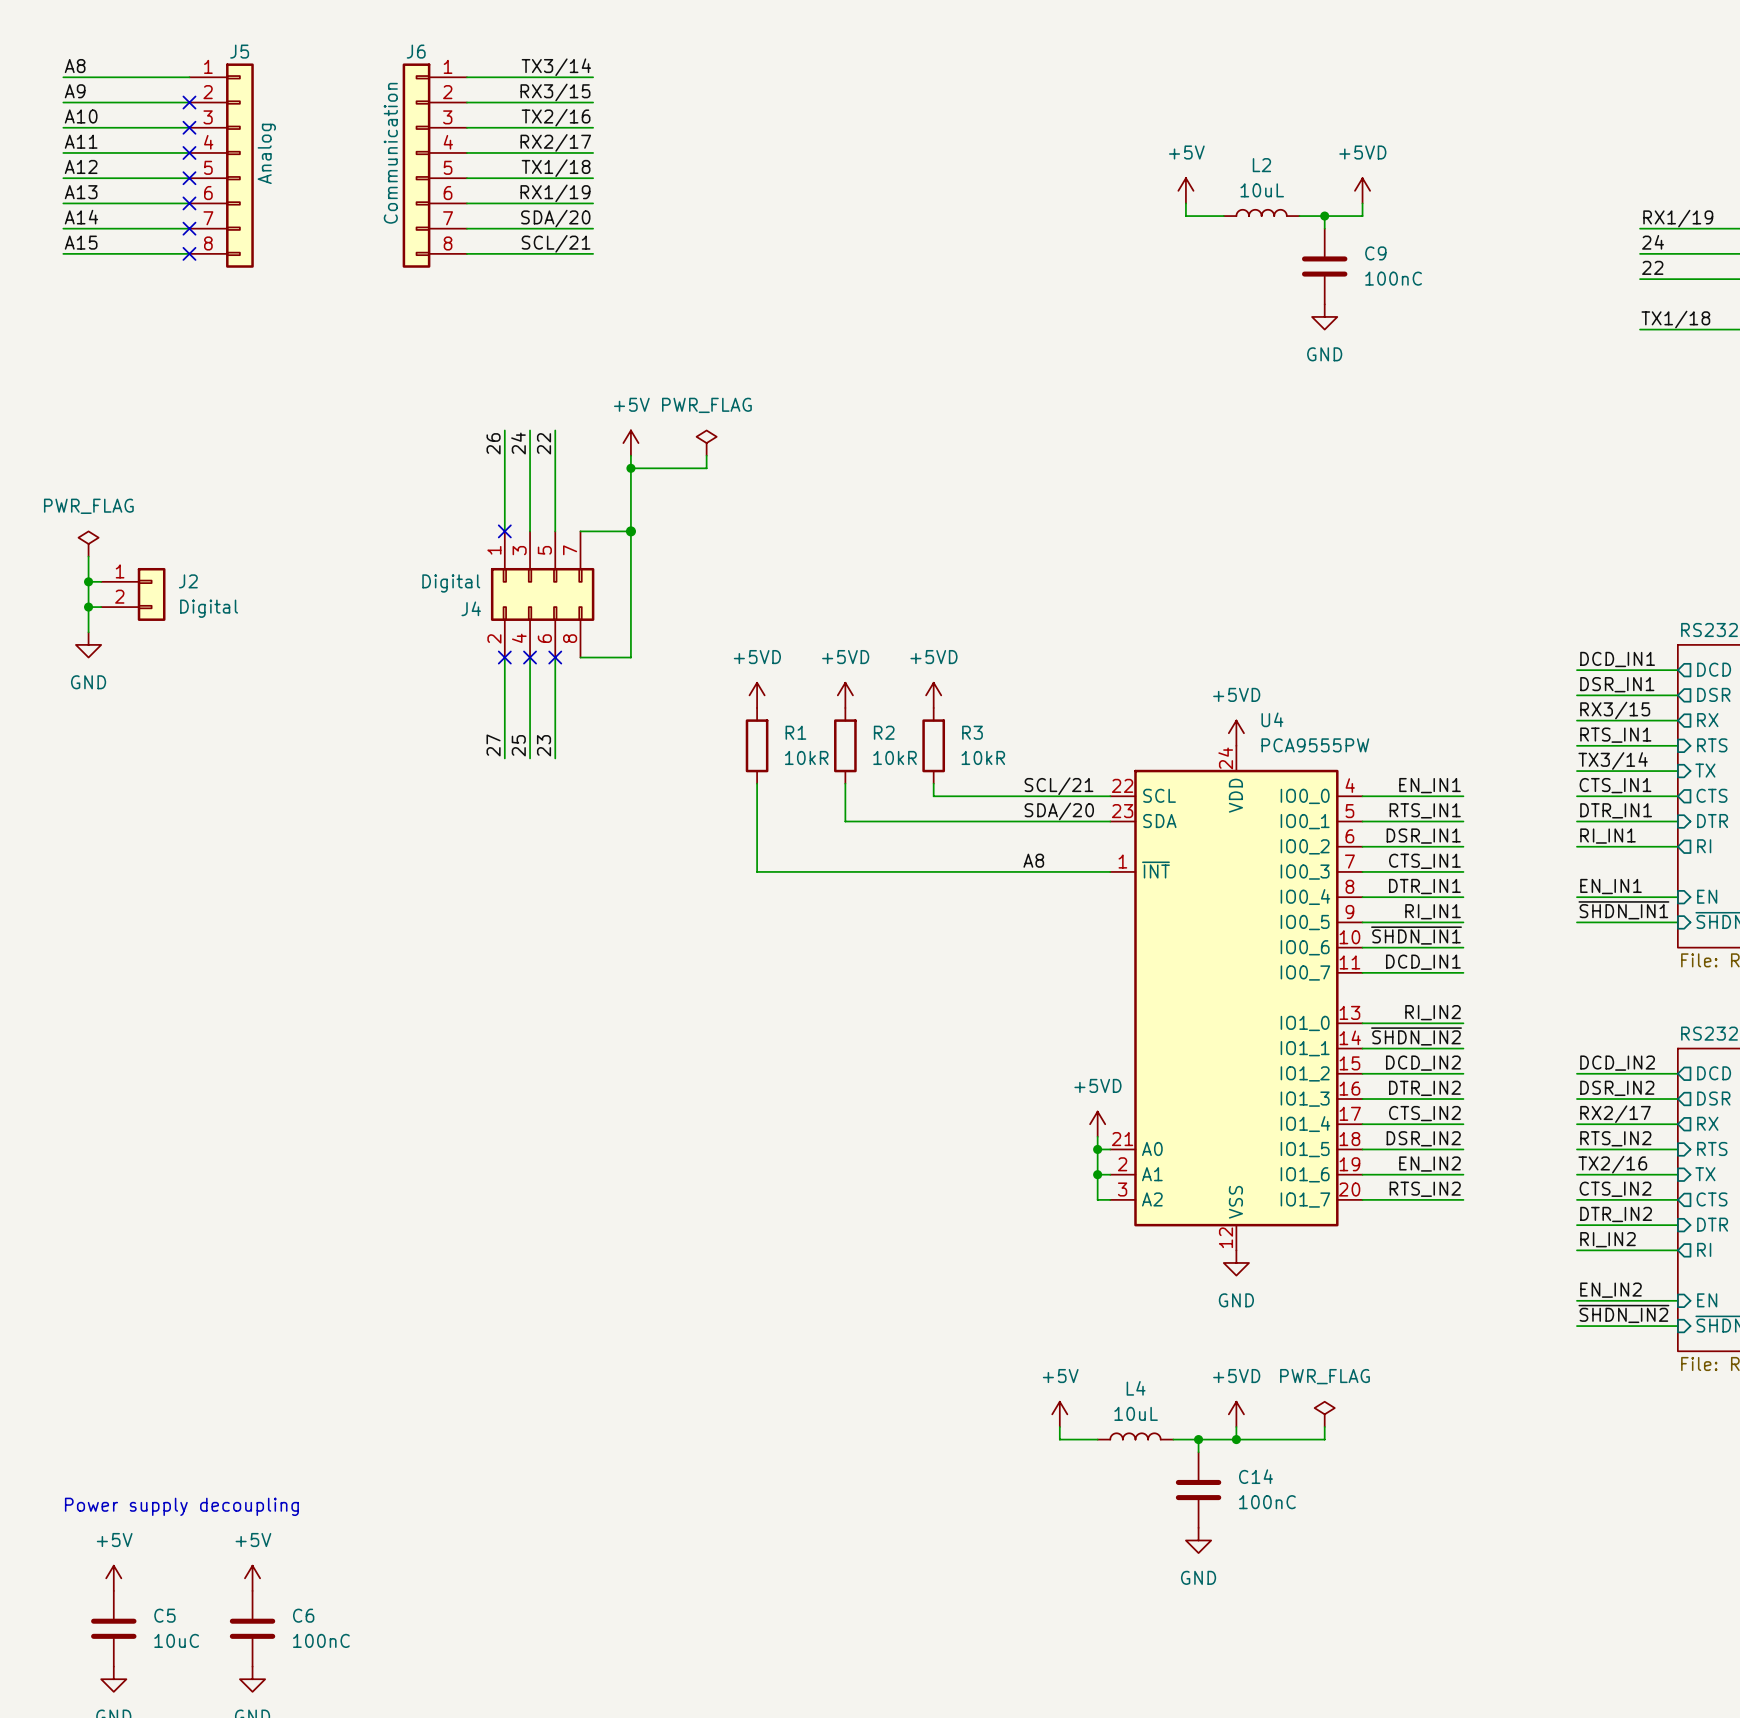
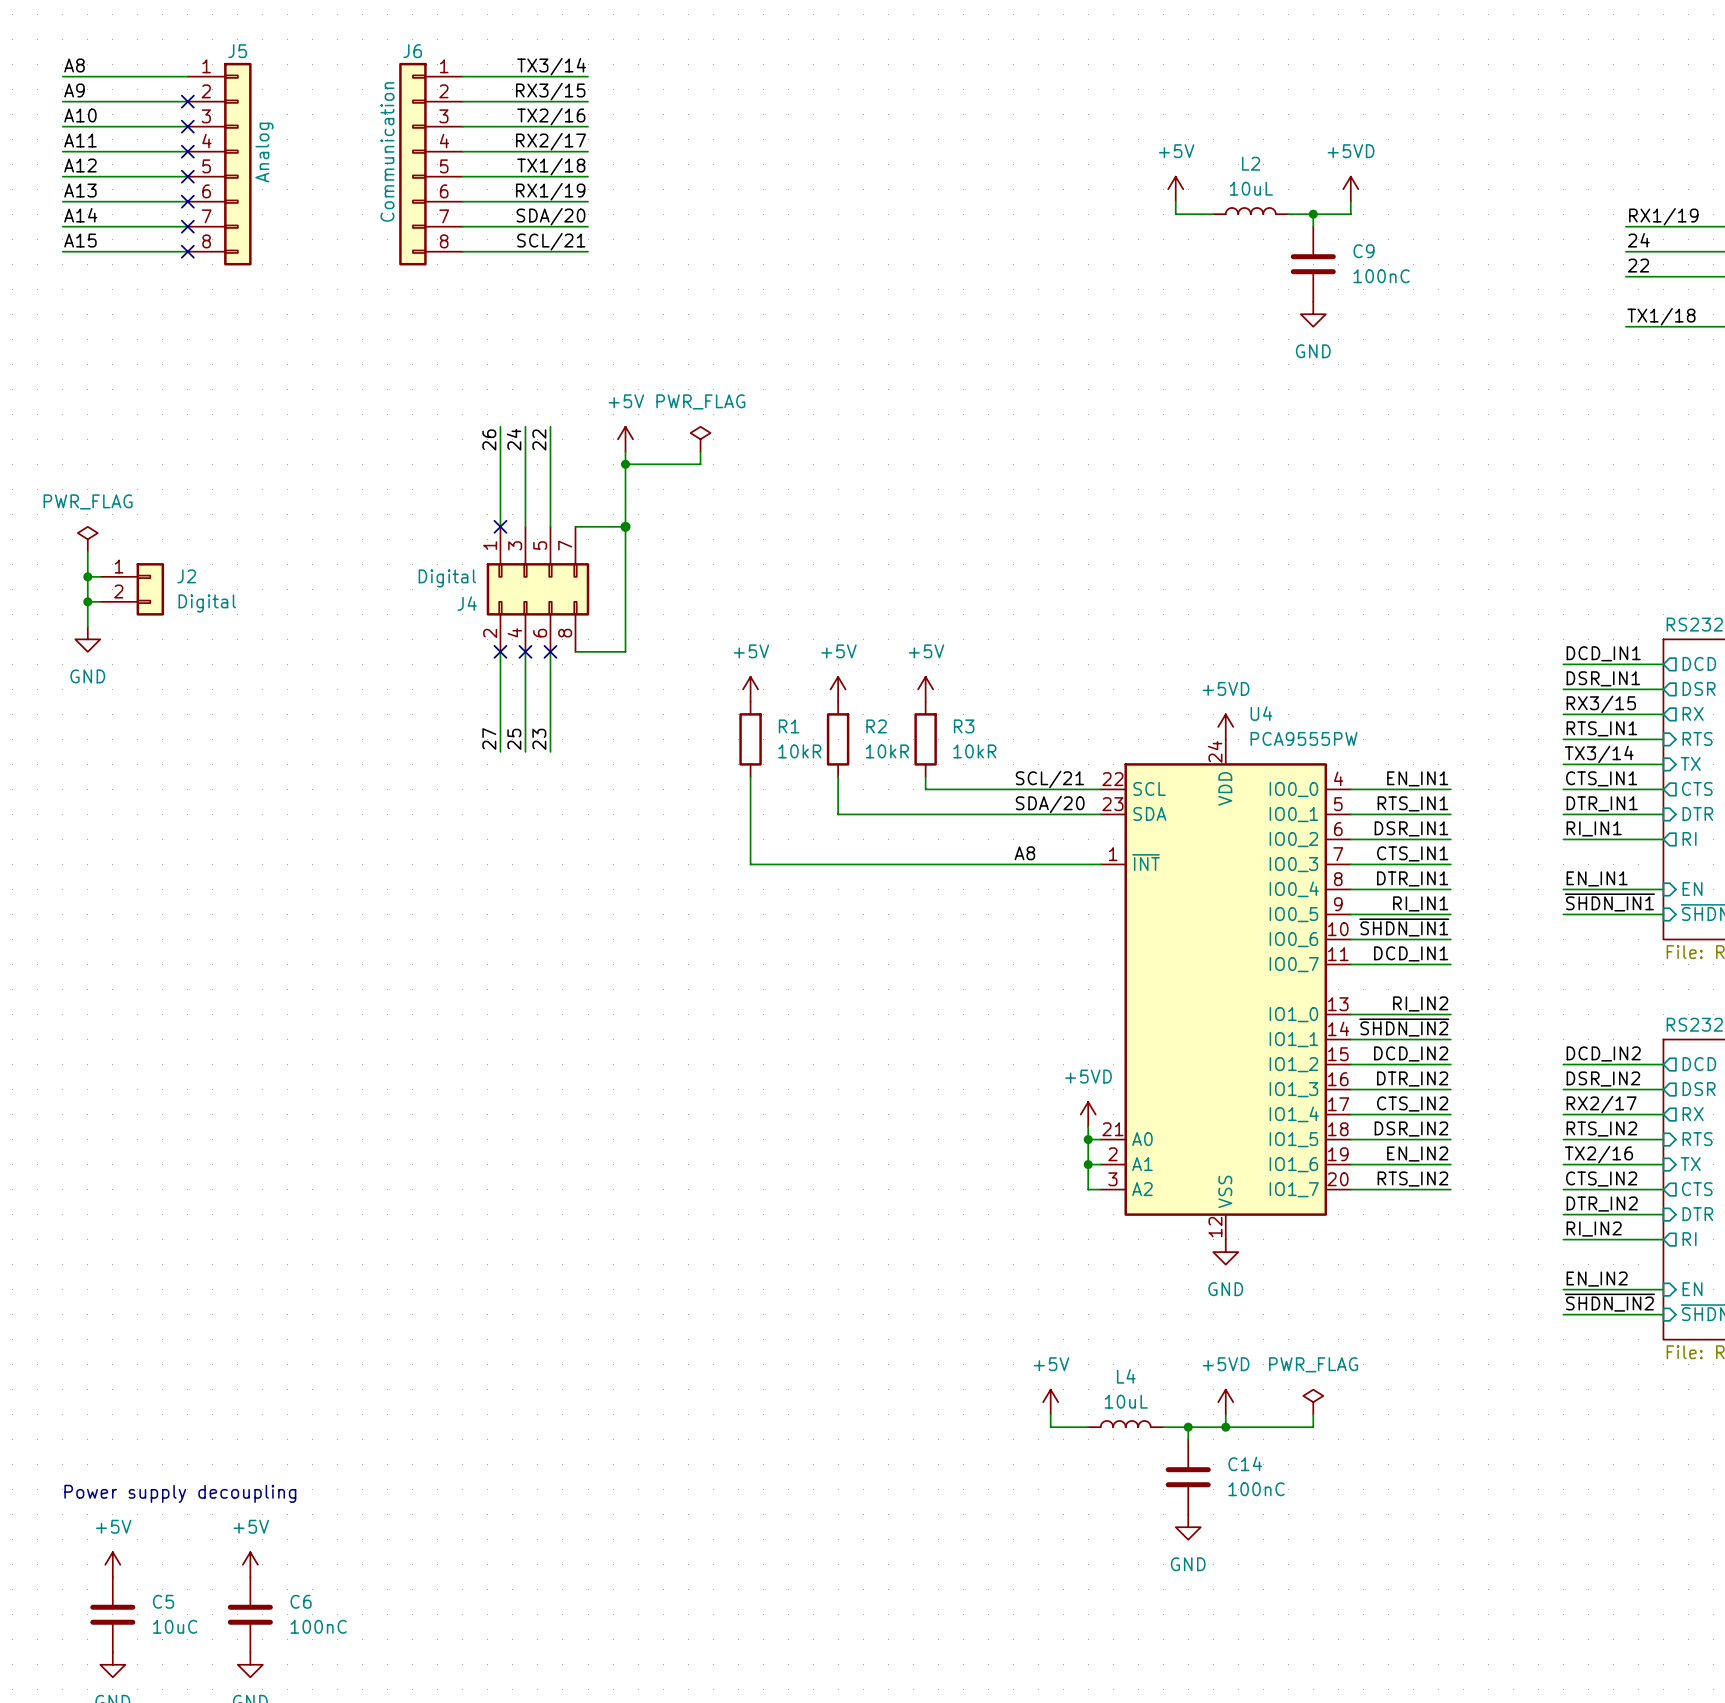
power symbol: +5VD (757, 695) -> +5V (750, 689)
power symbol: +5VD (845, 695) -> +5V (838, 689)
power symbol: +5VD (933, 695) -> +5V (925, 689)

